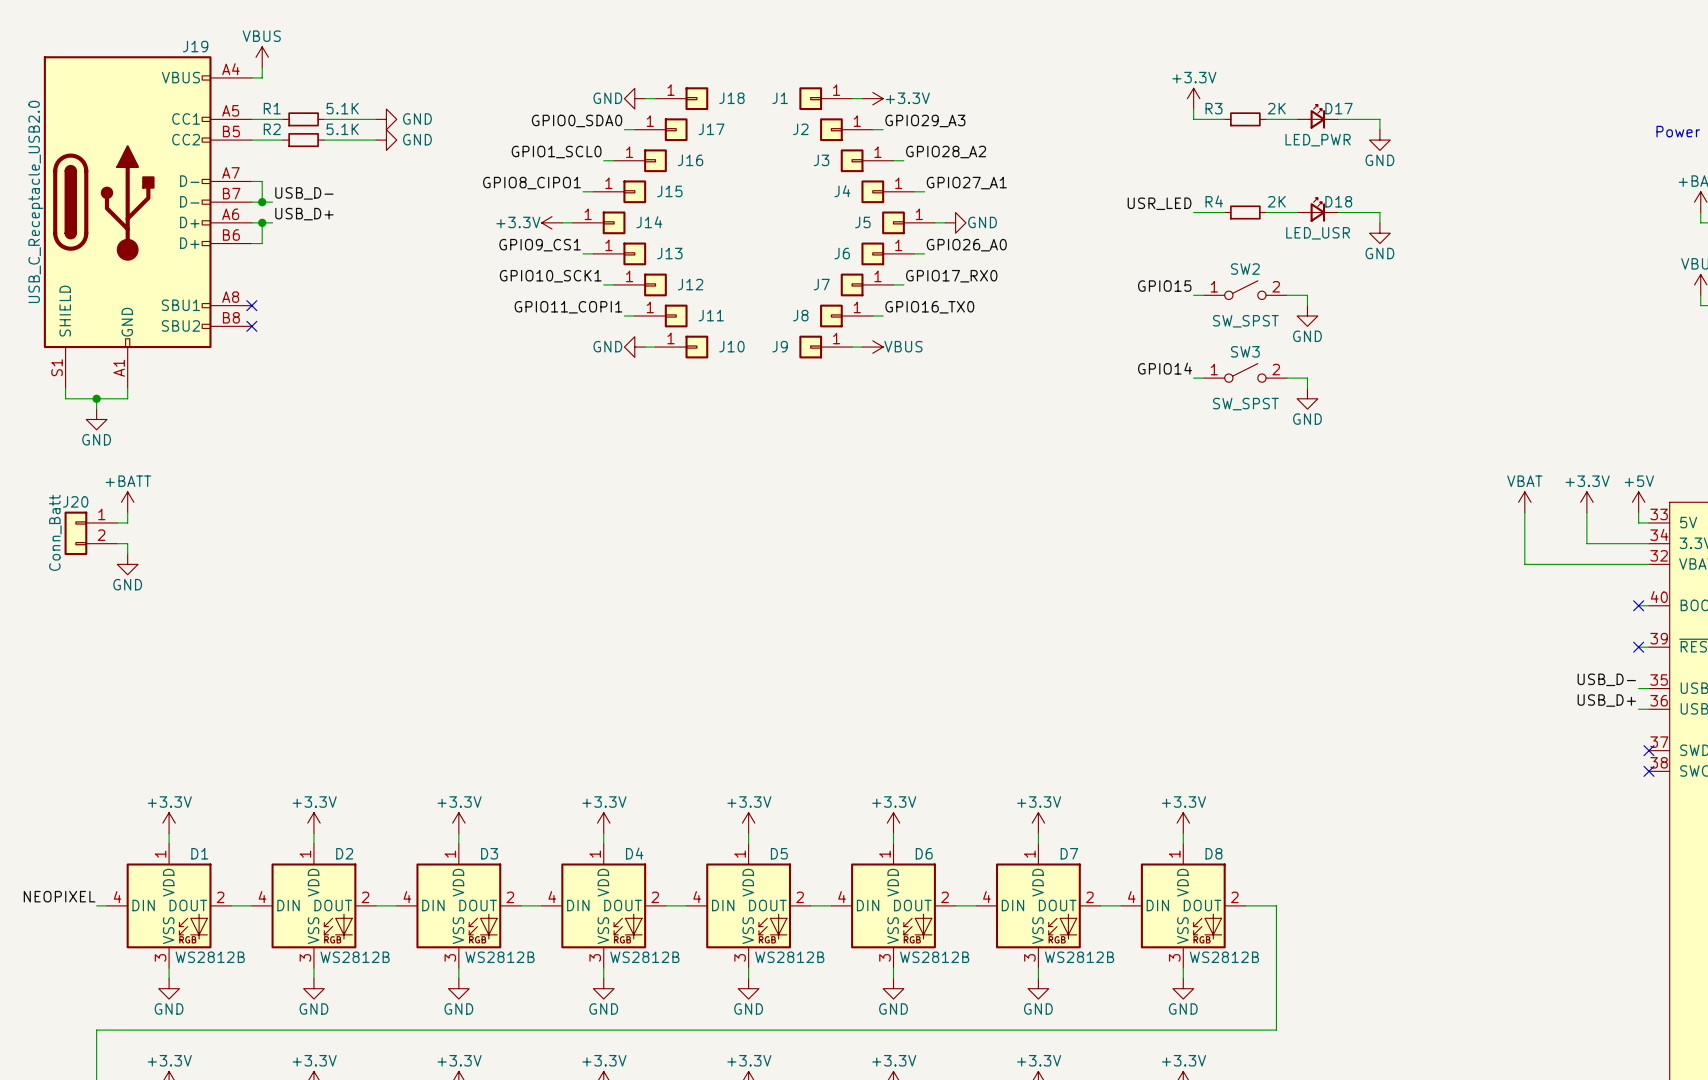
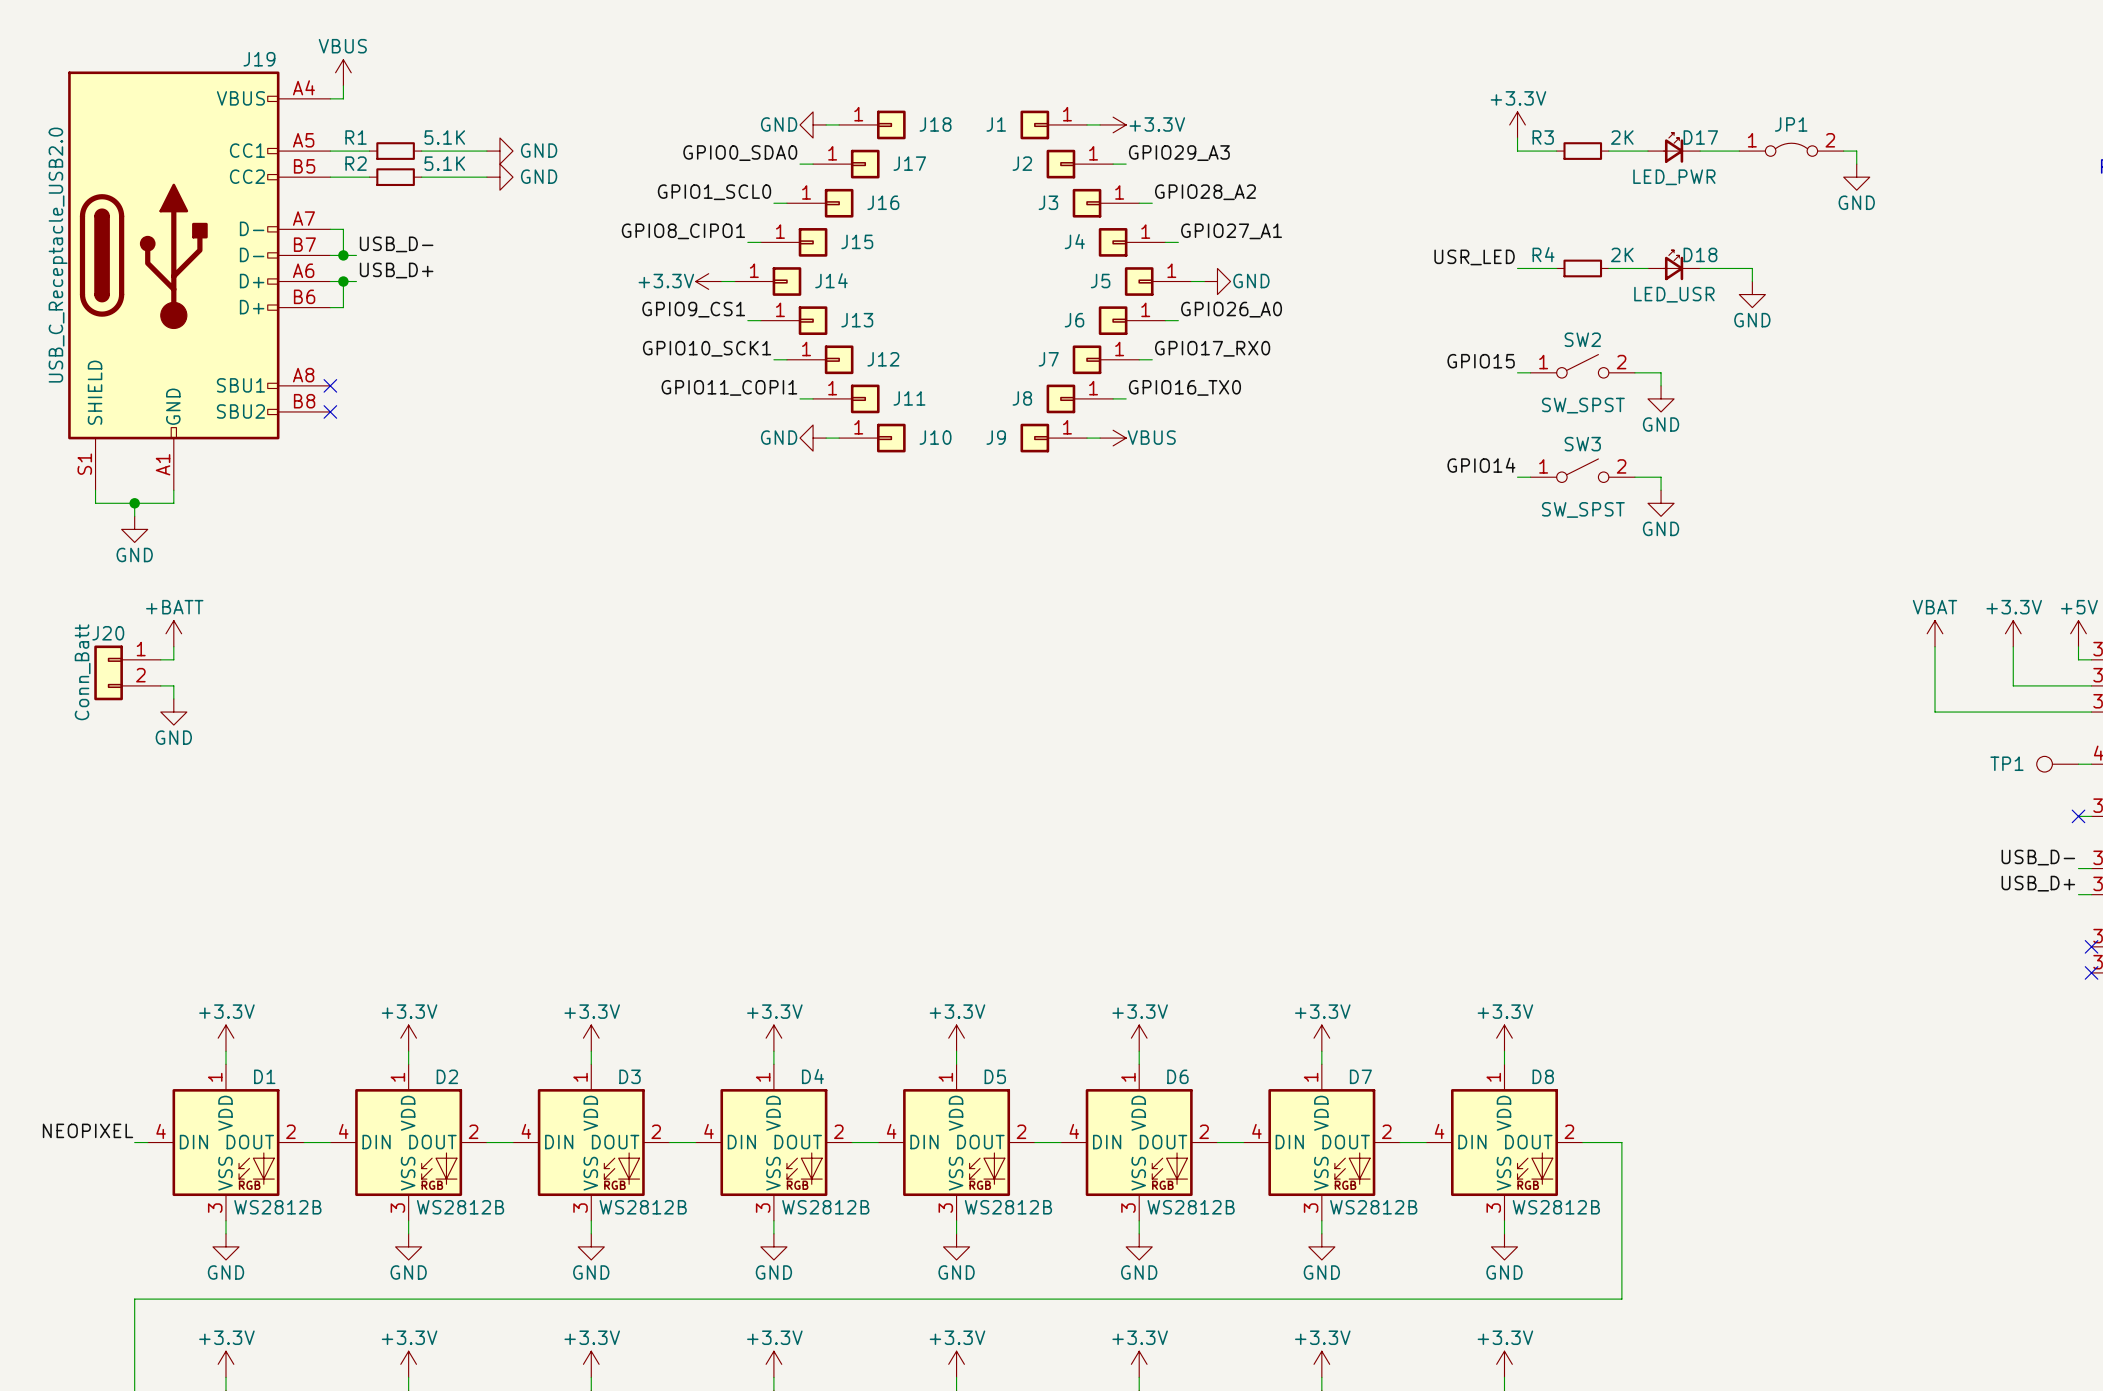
JP1: none -> (1791, 149)
wire: (1369, 119) (1379, 119) (1379, 129) -> (1843, 151) (1856, 151) (1856, 164)
power symbol position: GND (1379, 140) -> GND (1856, 177)
TP1: none -> (2057, 764)
no-connect mark: (1638, 605) -> none

